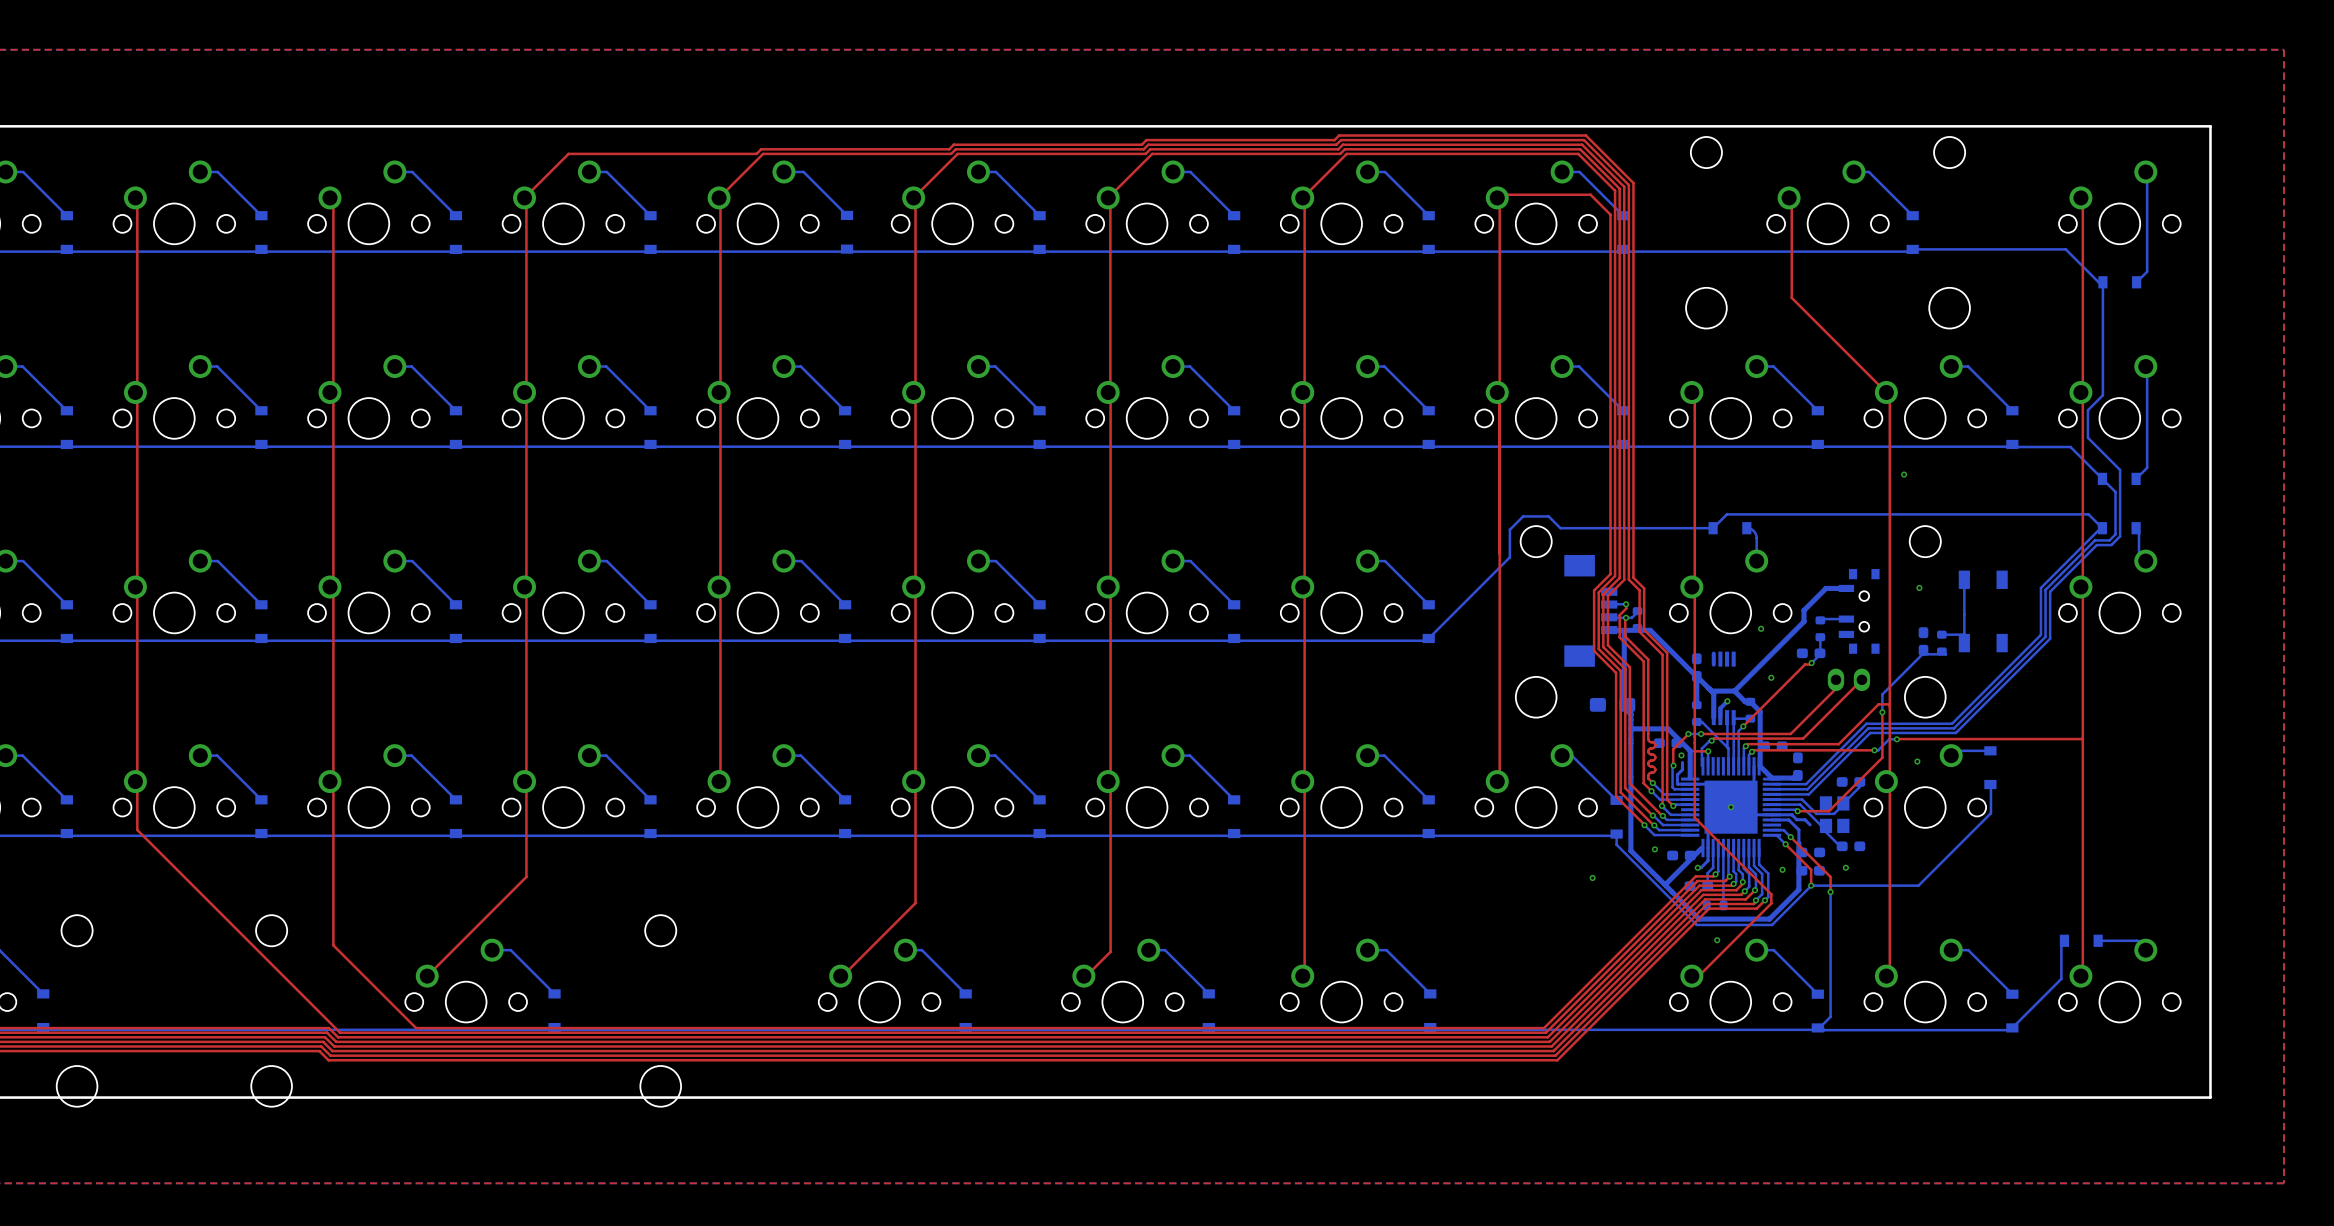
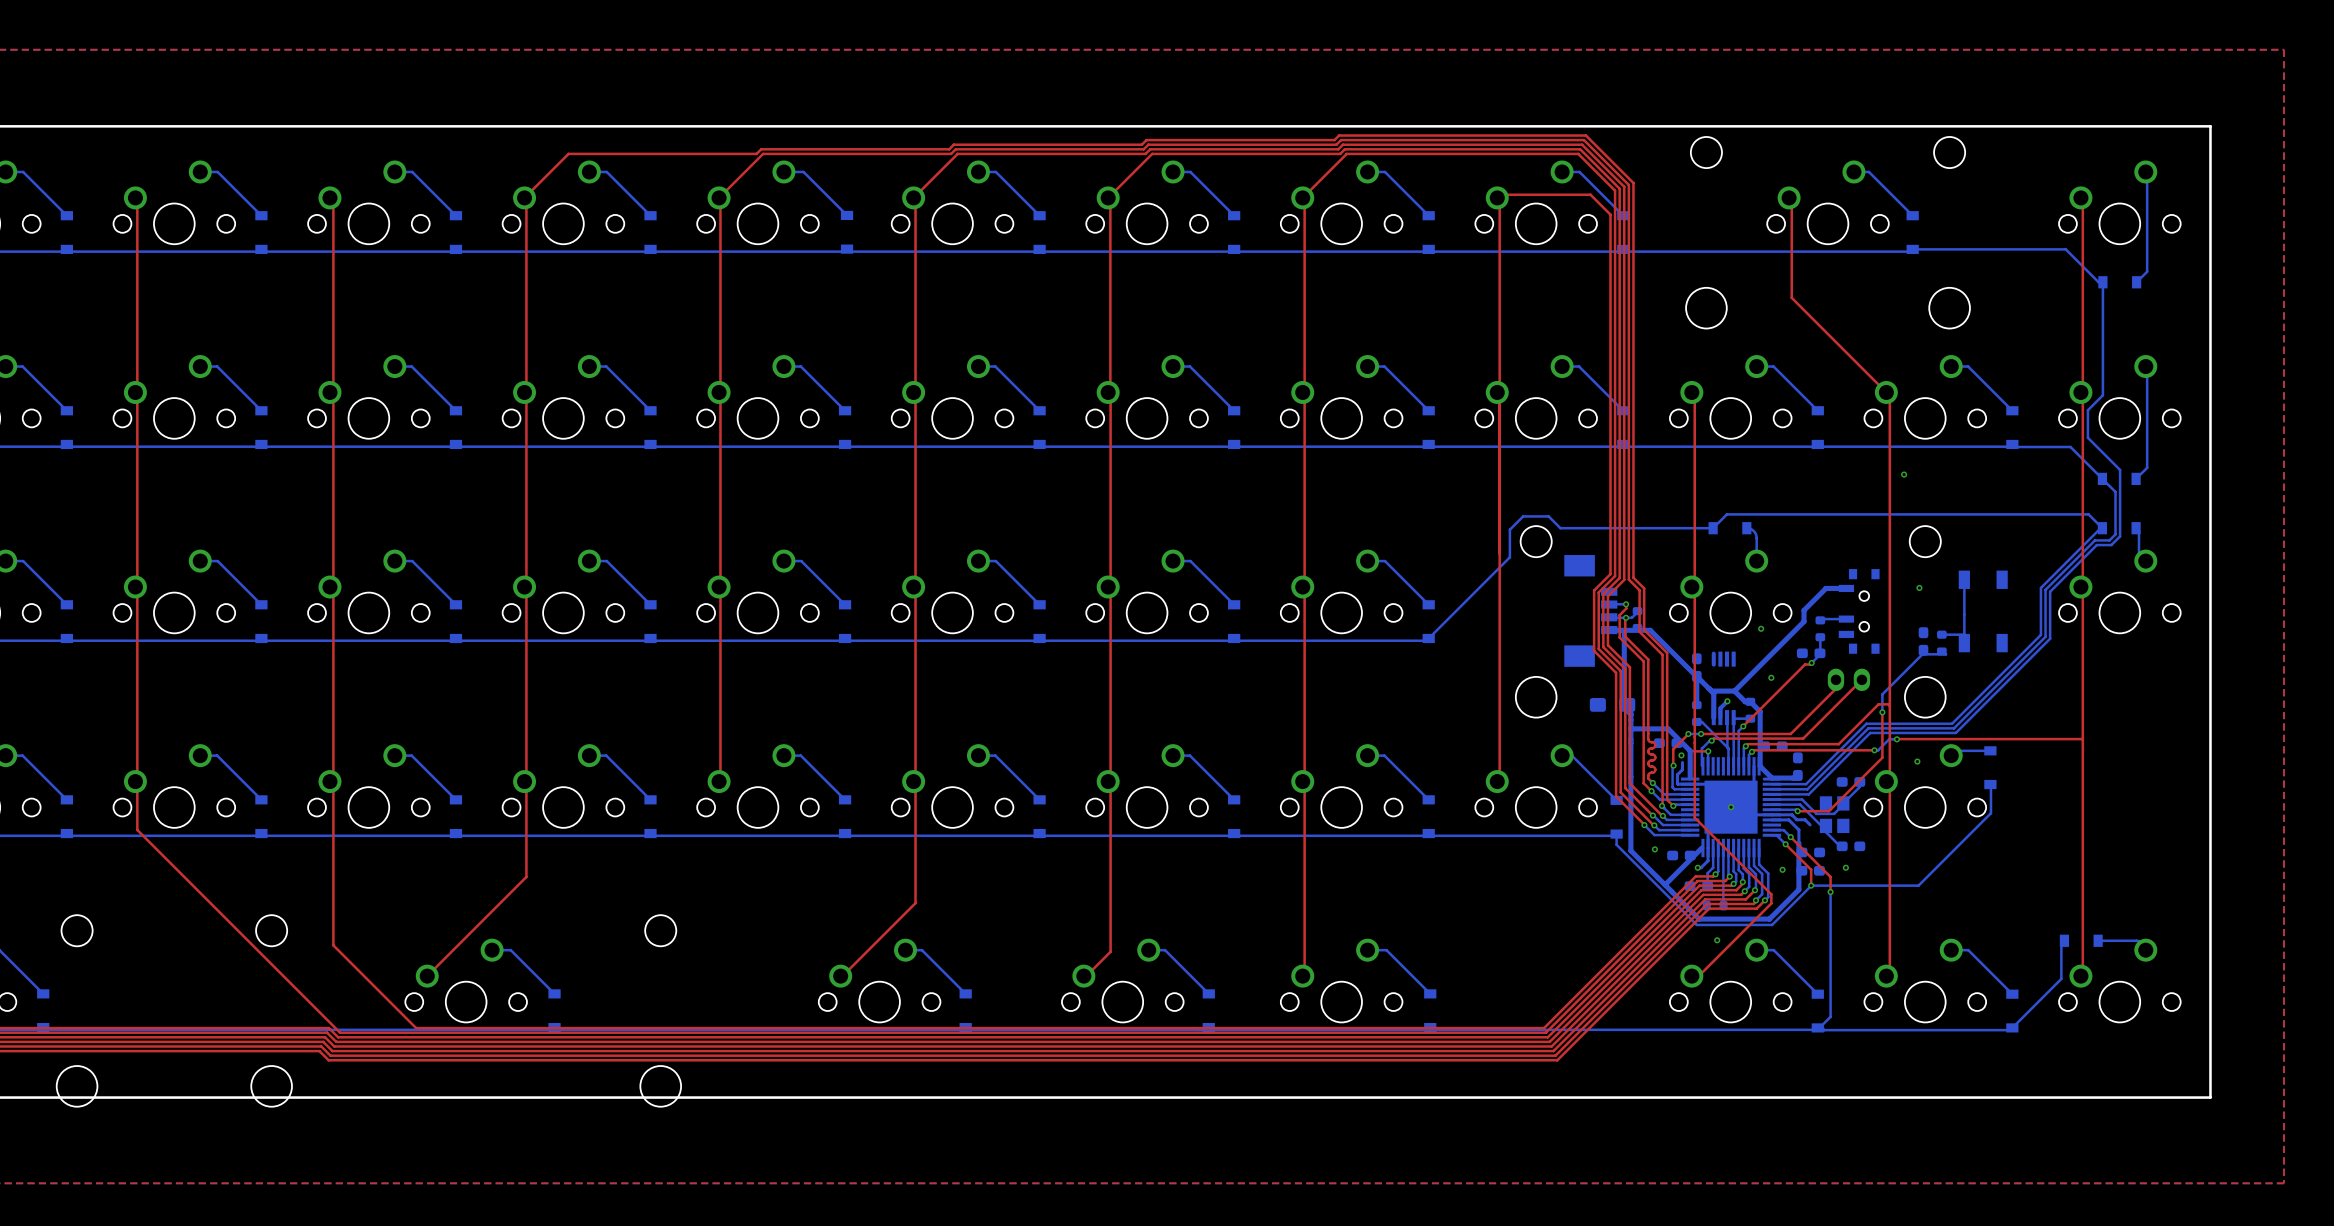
via: (1592, 877) -> none

